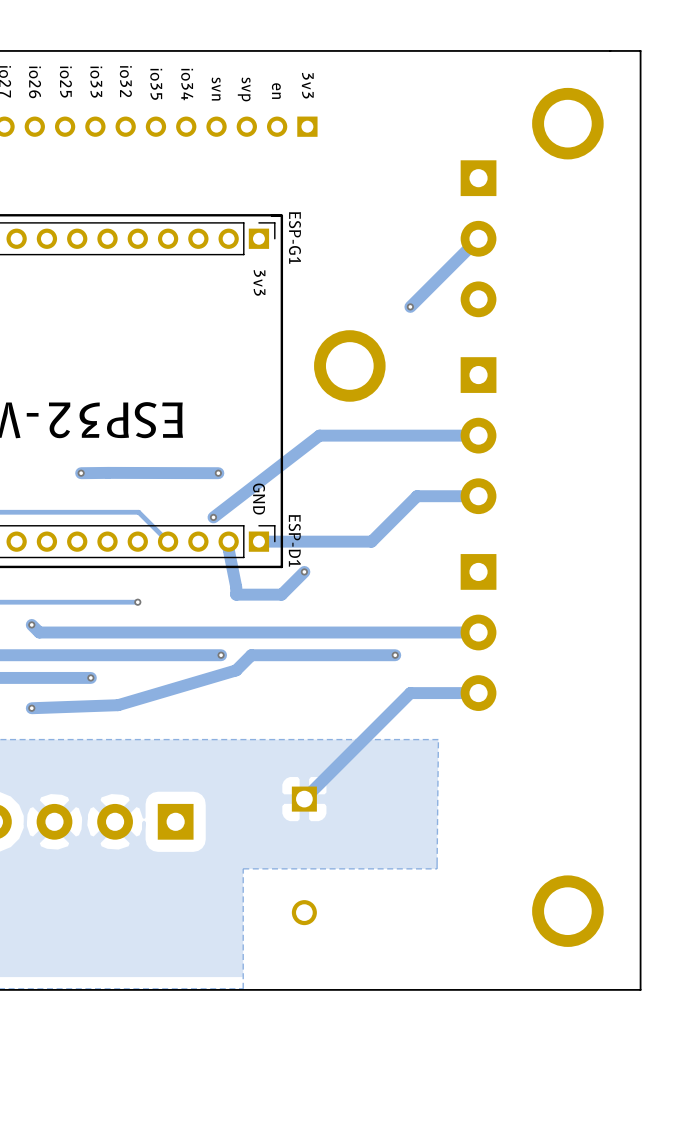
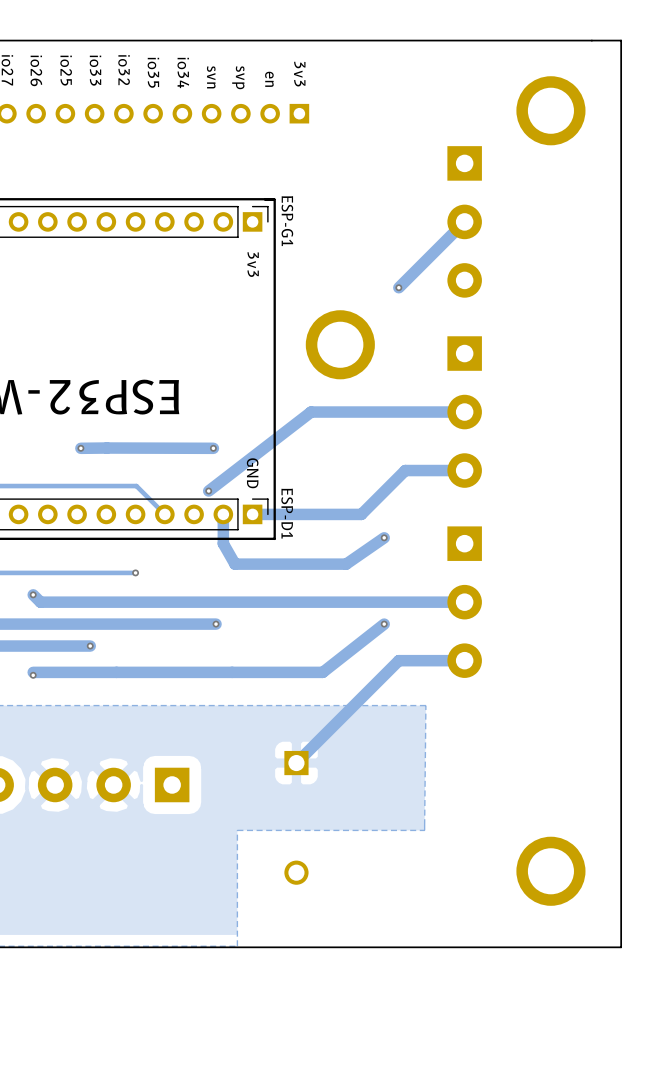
track: (228, 549) (236, 594) (281, 594) (304, 571) -> (223, 521) (223, 543) (235, 564) (346, 564) (384, 537)
via: none -> (384, 537)
via: (304, 571) -> none
track: (395, 655) (251, 655) (236, 670) (118, 705) (31, 708) -> (384, 624) (322, 672) (33, 672)

